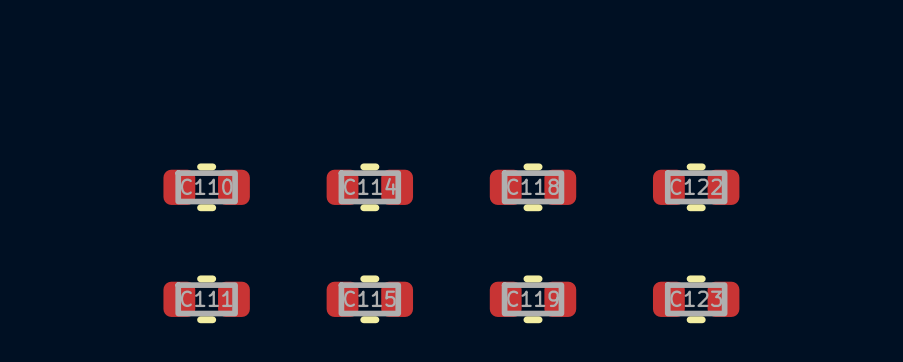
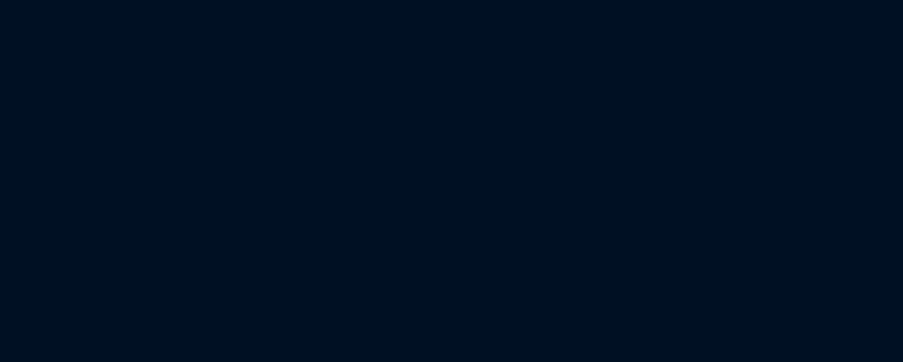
C110: (206, 187) -> none
C114: (369, 187) -> none
C118: (533, 187) -> none
C122: (696, 187) -> none
C111: (206, 299) -> none
C115: (369, 299) -> none
C119: (533, 299) -> none
C123: (696, 299) -> none

